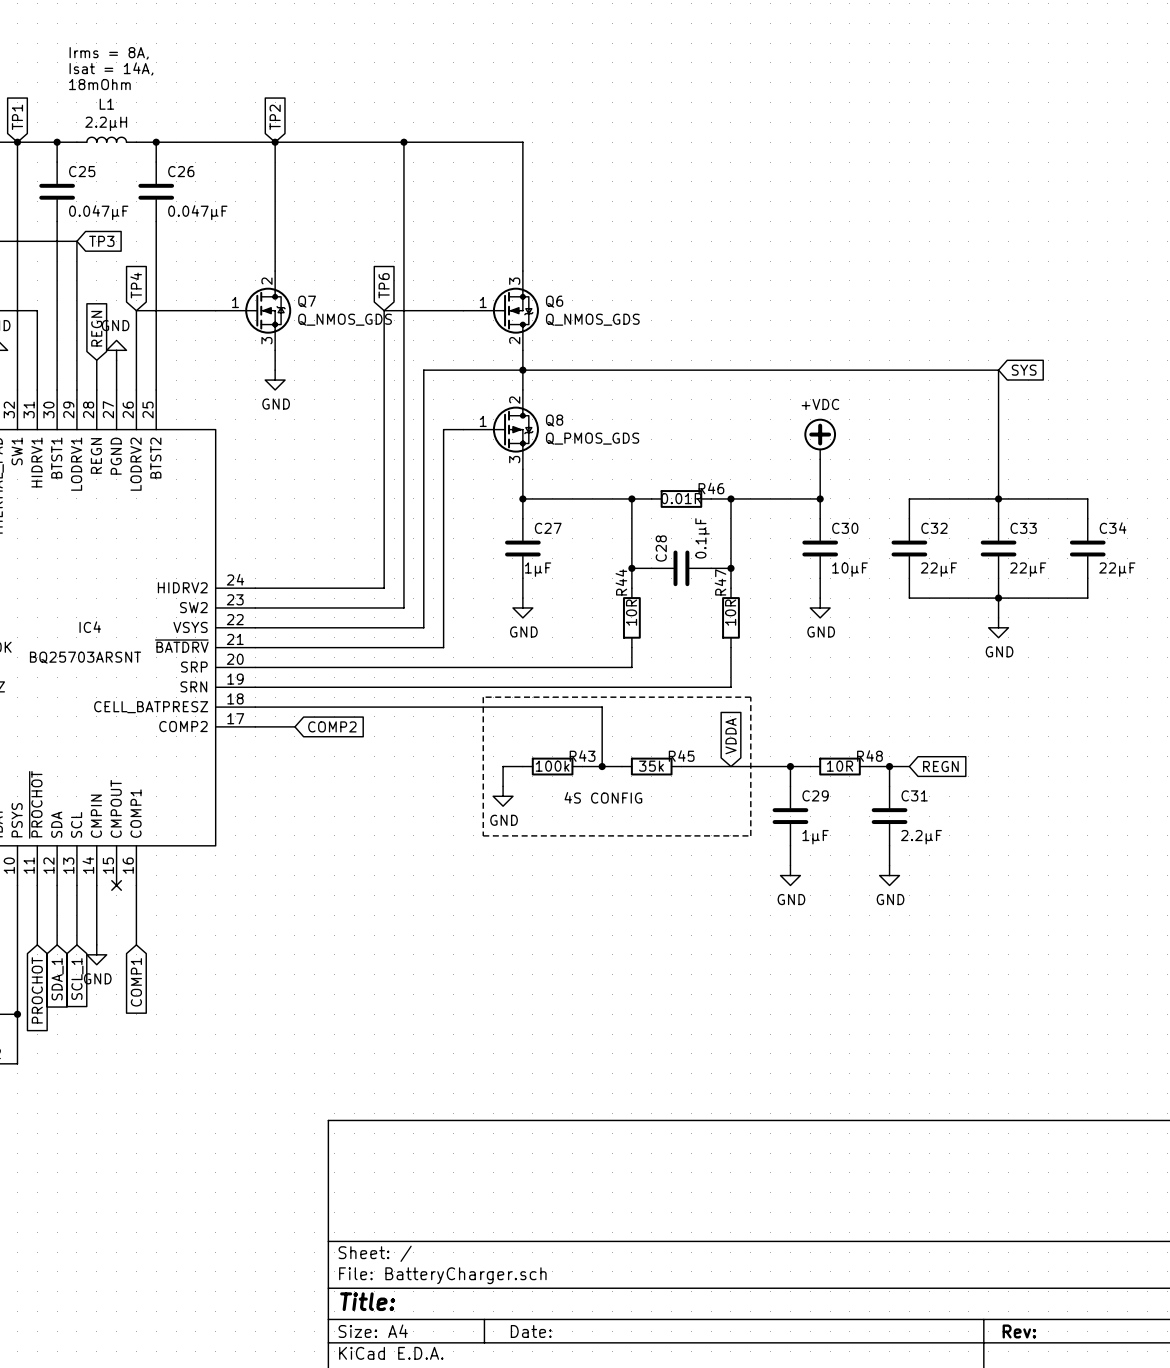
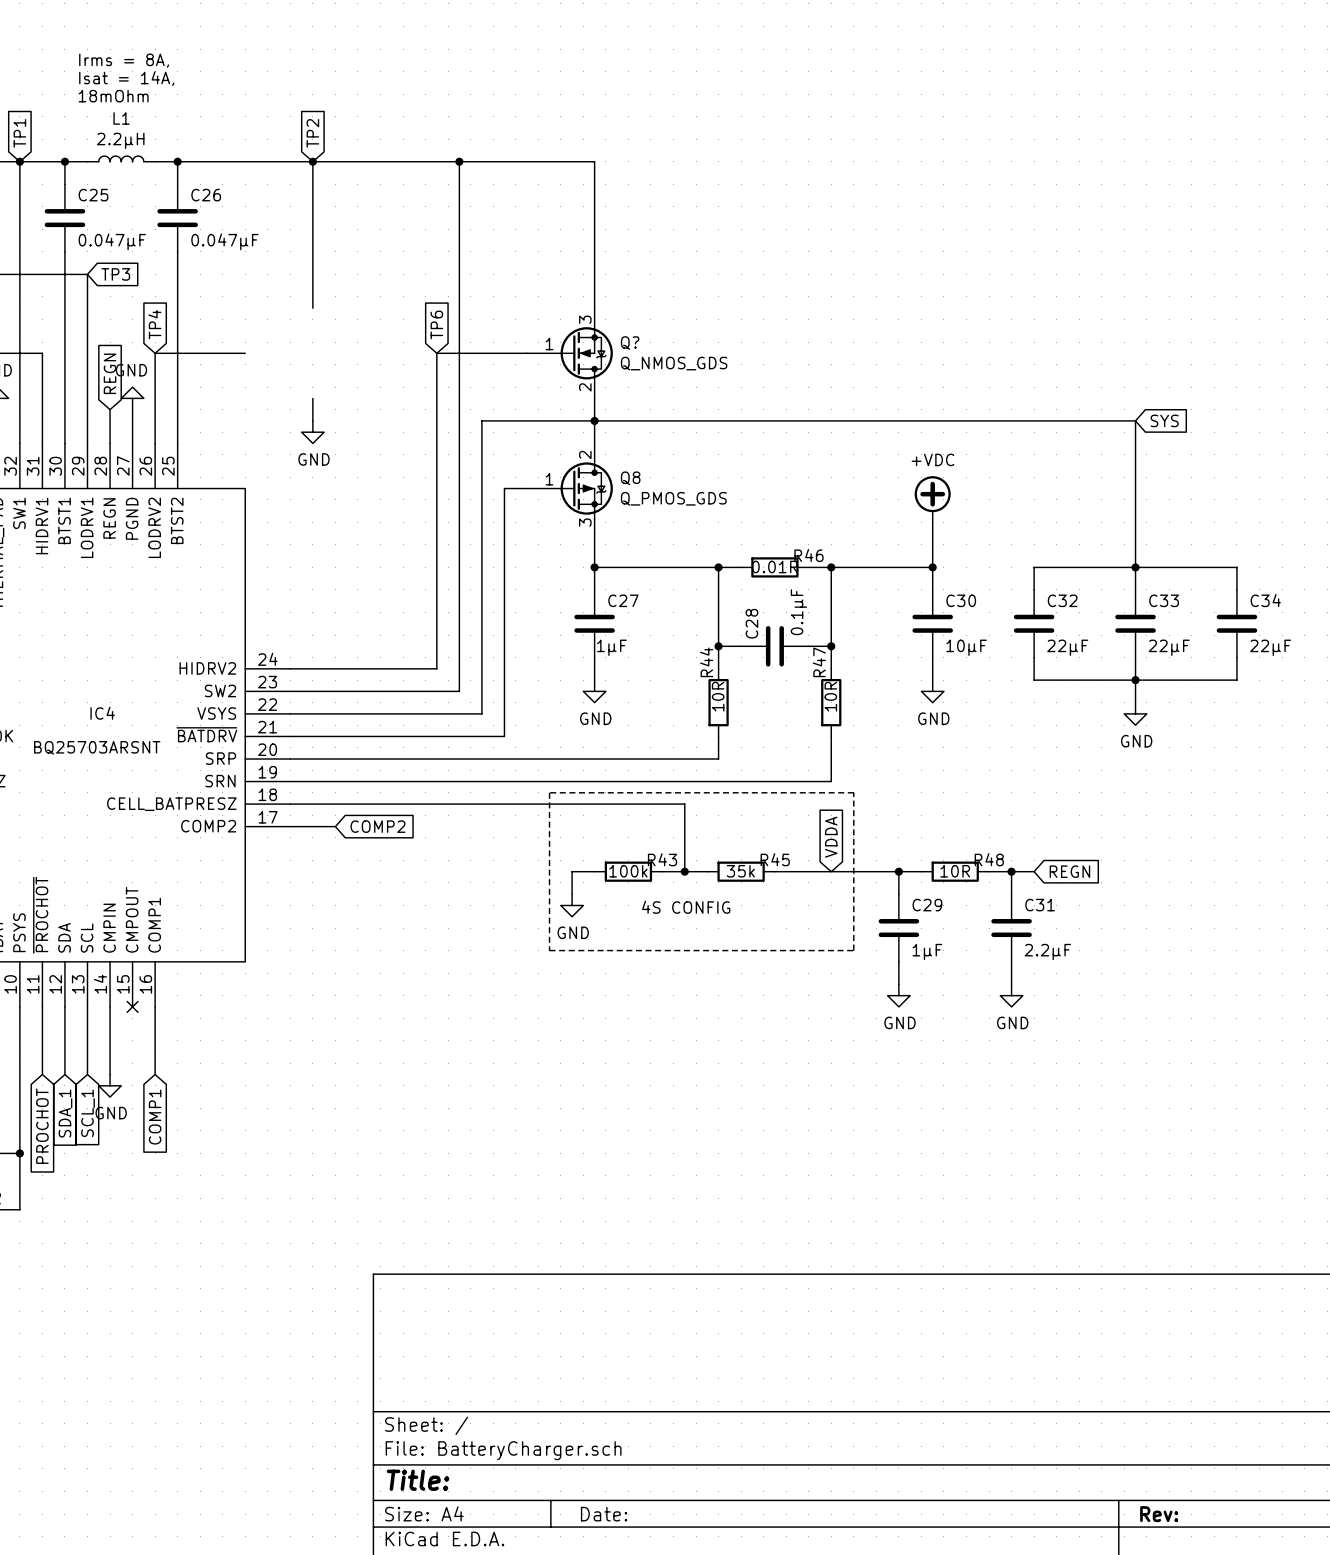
Q6 name: Q6 (554, 301) -> Q? (630, 343)
Q7: Q_NMOS_GDS (253, 310) -> none

